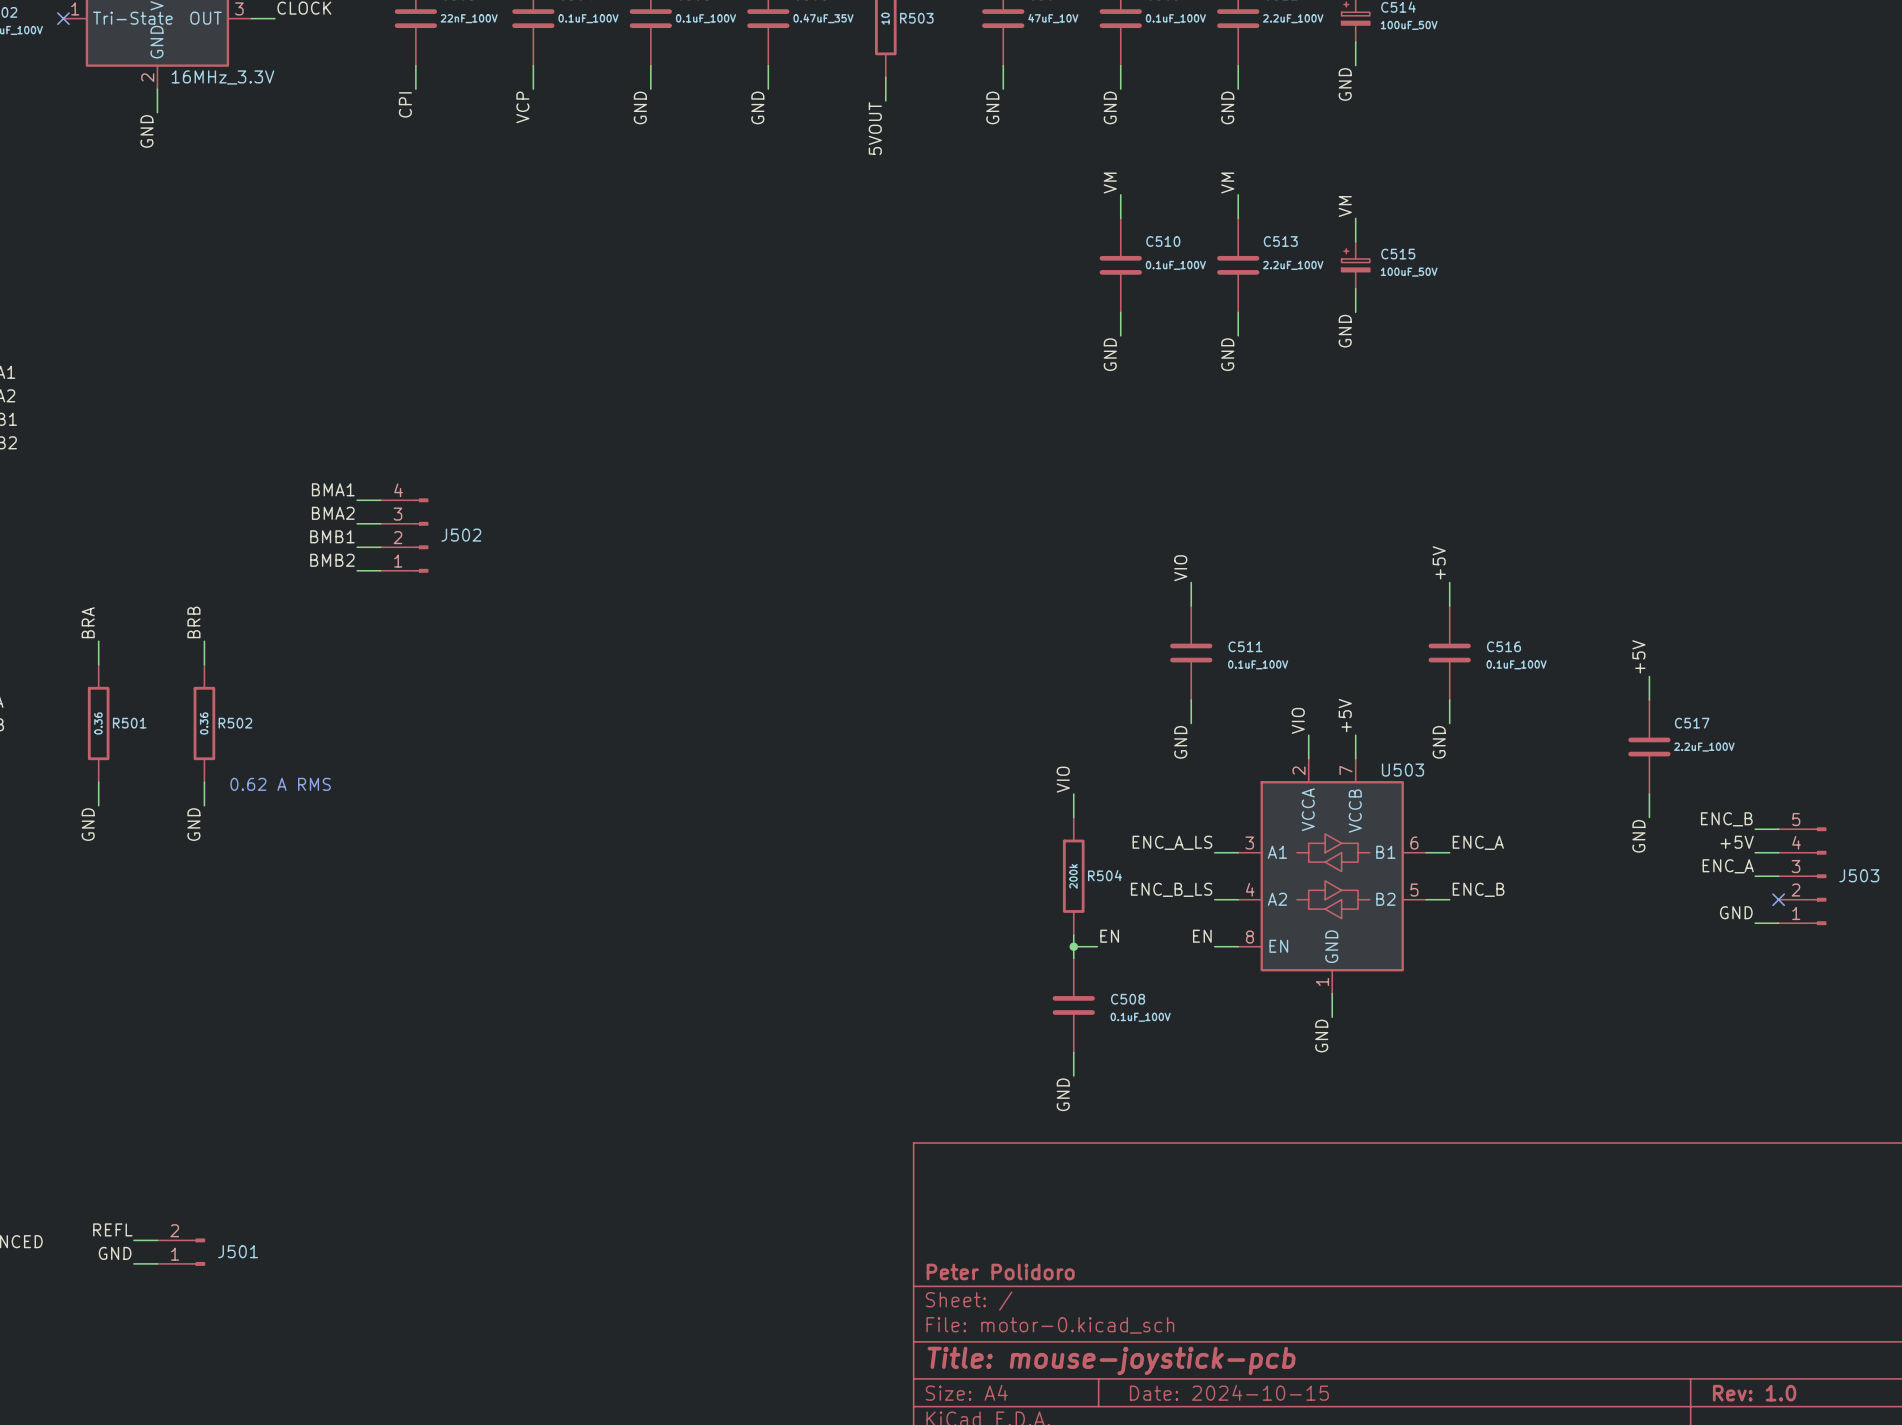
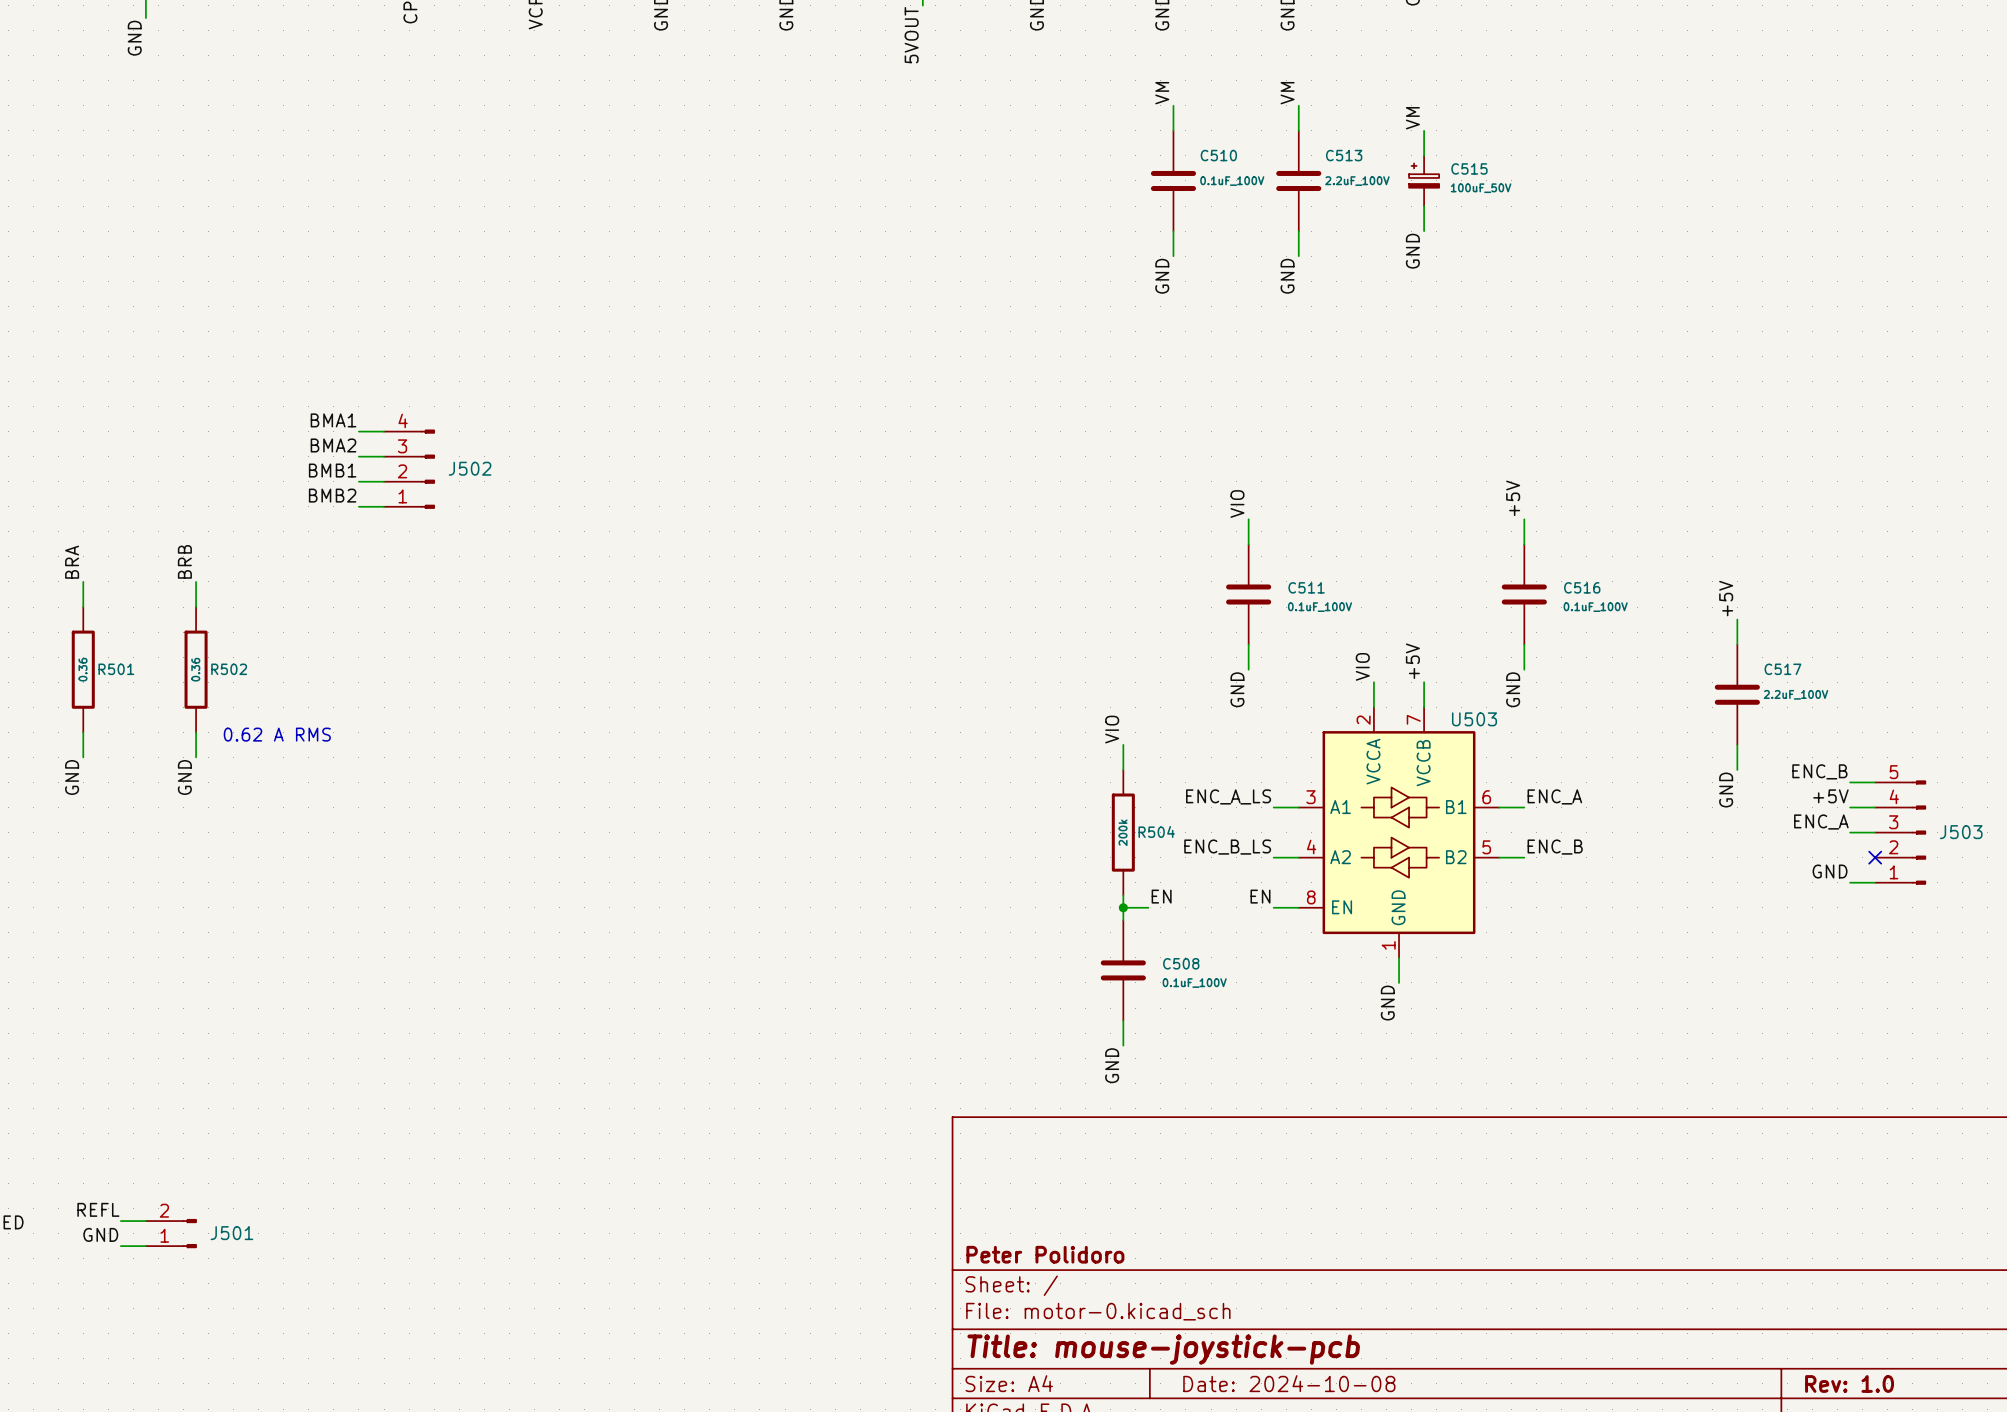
title block: Date: 2024-10-15 (1229, 1392) -> Date: 2024-10-08 (1289, 1383)

